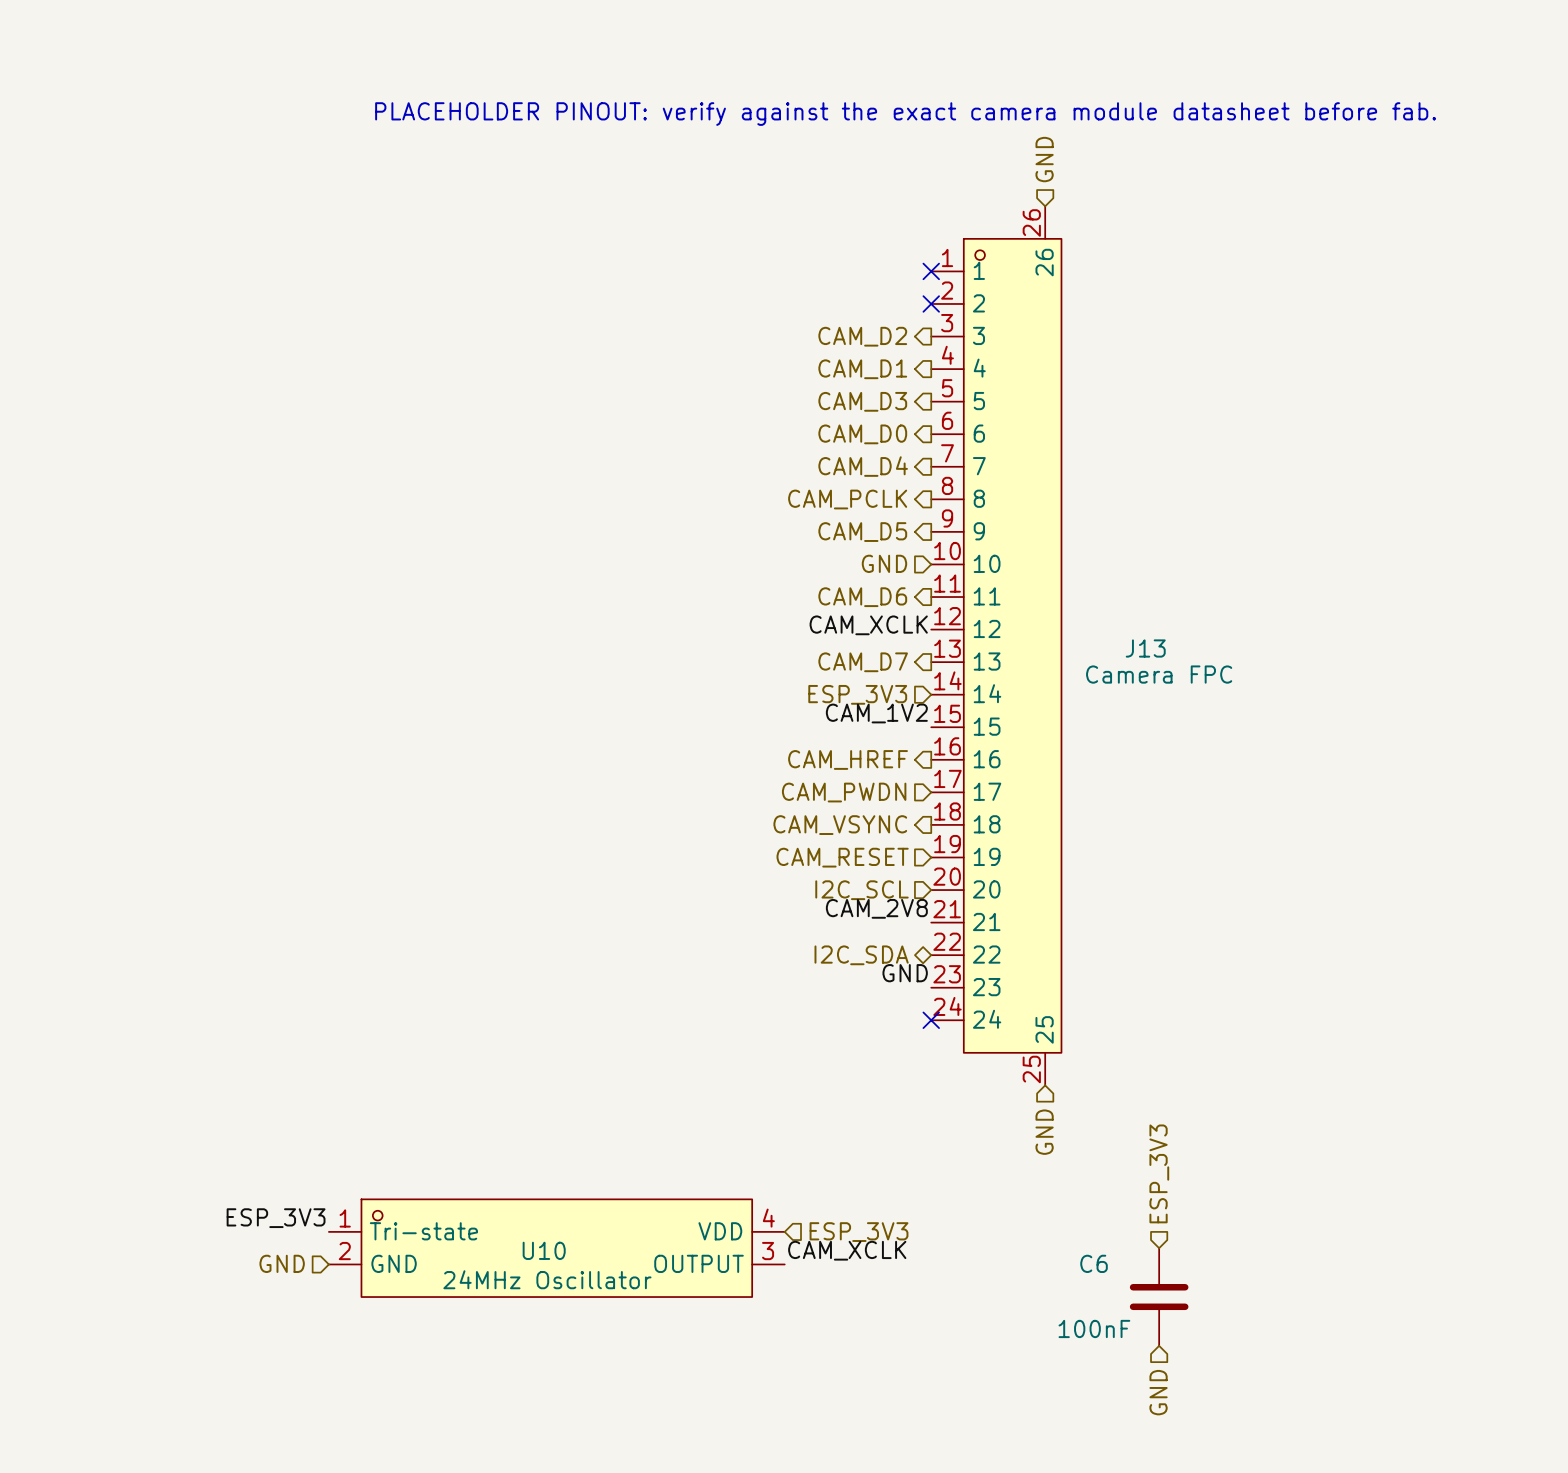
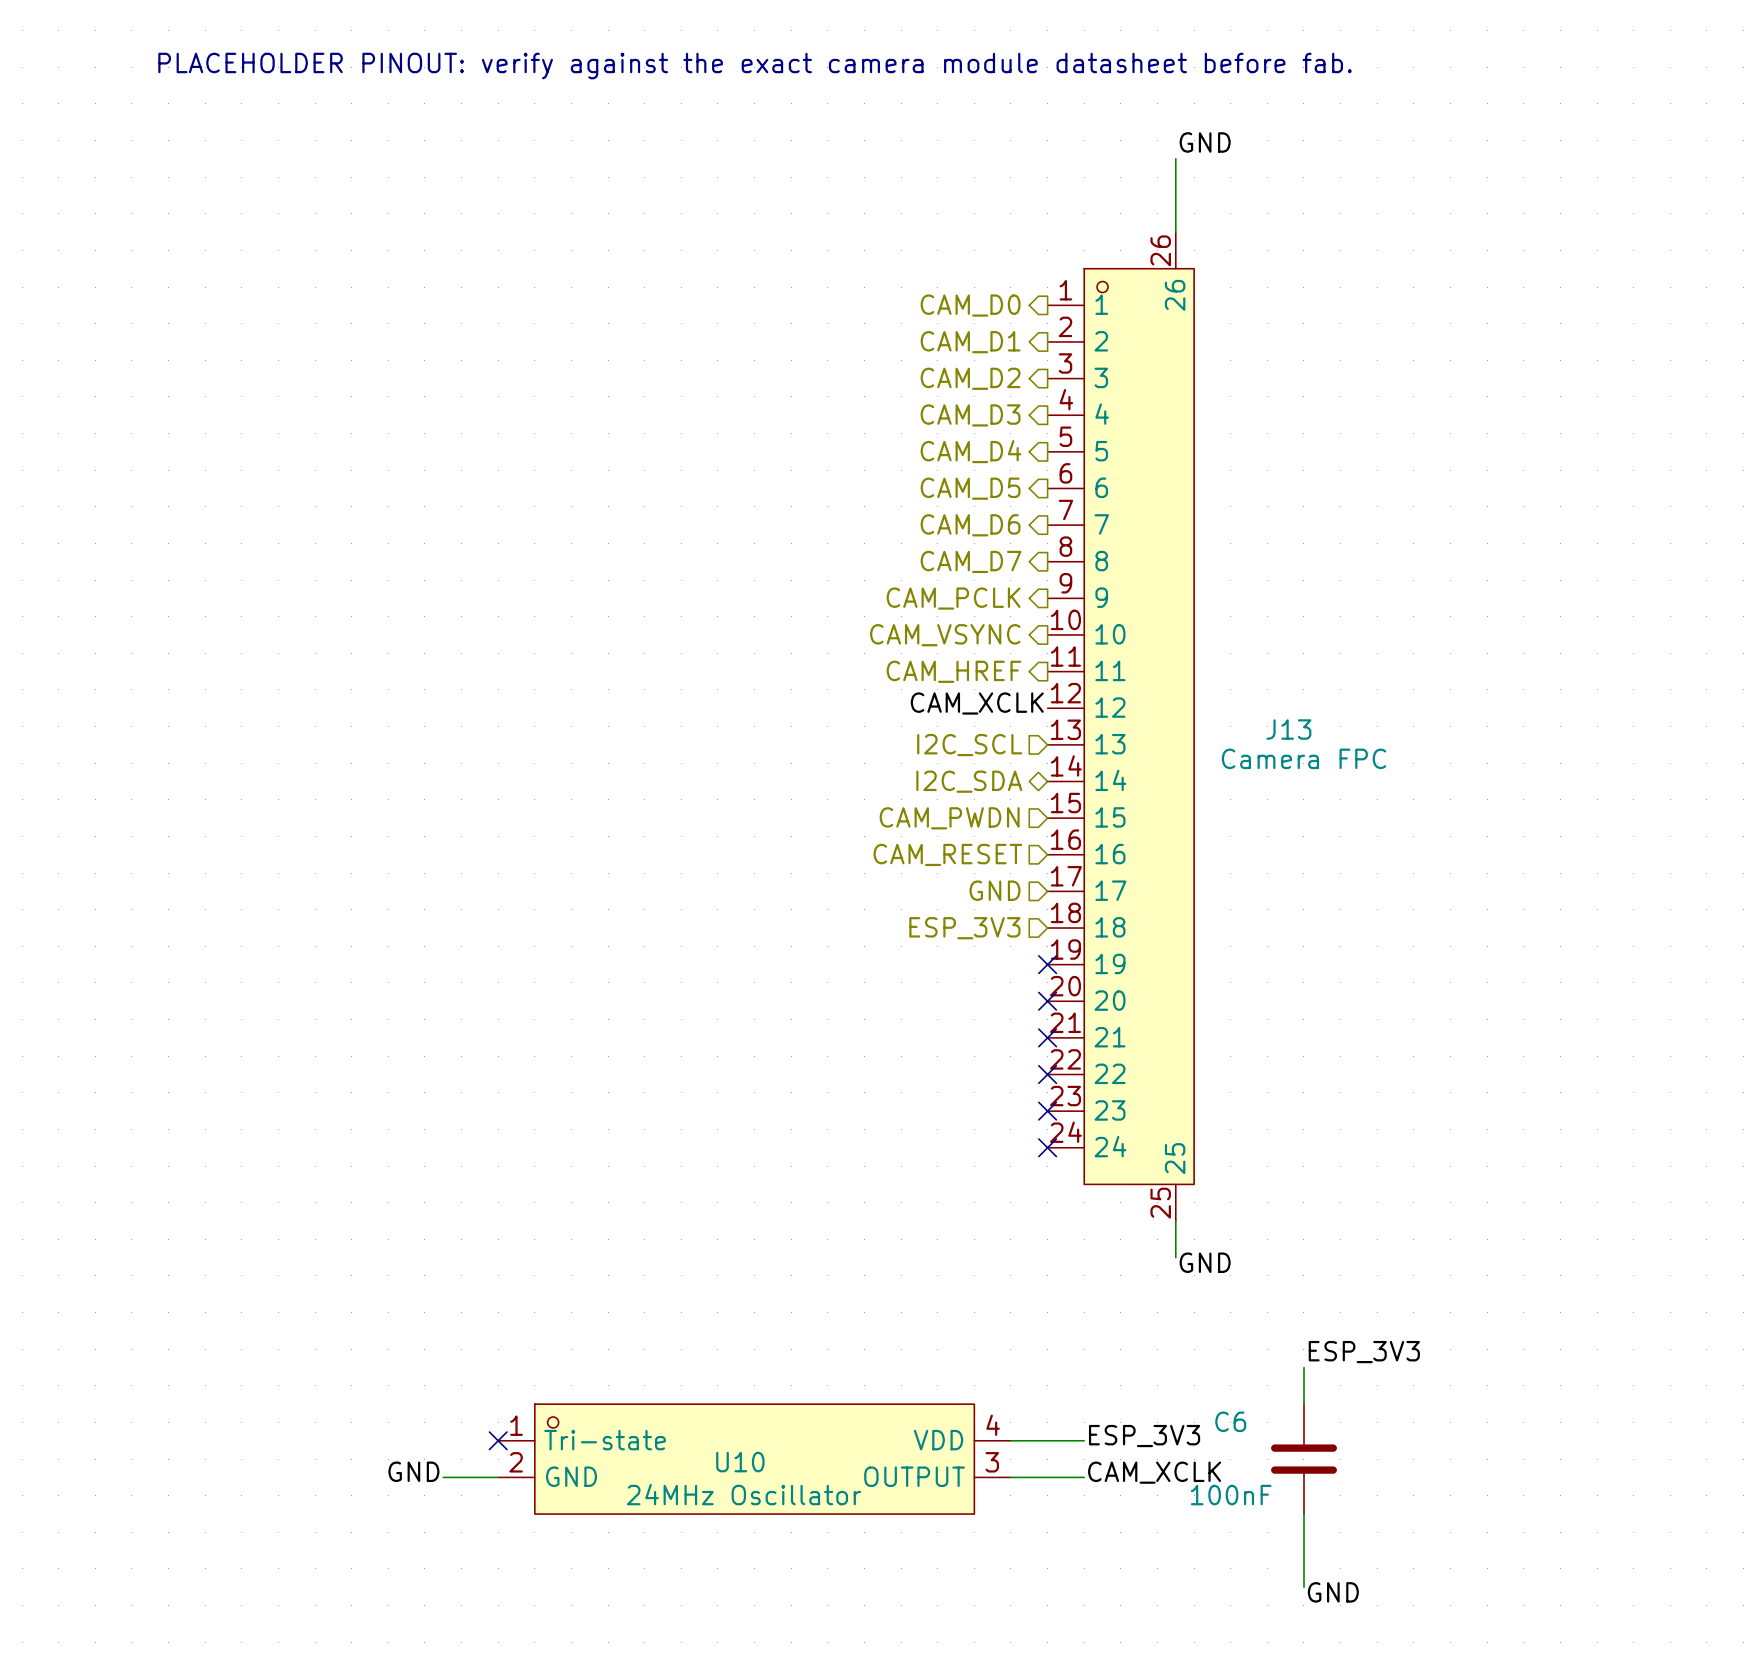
text position: PLACEHOLDER PINOUT: verify against the exact camera module datasheet before fab. (905, 114) -> PLACEHOLDER PINOUT: verify against the exact camera module datasheet before fab. (755, 66)
label: none -> GND (1205, 142)
wire: none -> (1175, 158) (1175, 232)
hierarchical label: GND (1044, 159) -> none
hierarchical label: none -> CAM_D0 (970, 305)
no-connect mark: (931, 271) -> none
no-connect mark: (931, 303) -> none
hierarchical label: none -> CAM_D1 (970, 342)
hierarchical label: CAM_D1 (862, 369) -> CAM_D3 (970, 415)
hierarchical label: CAM_D3 (862, 401) -> CAM_D4 (971, 451)
hierarchical label: CAM_D0 (862, 434) -> CAM_D5 (970, 488)
hierarchical label: CAM_D4 (863, 466) -> CAM_D6 (970, 525)
hierarchical label: CAM_PCLK (847, 499) -> CAM_D7 (971, 561)
hierarchical label: CAM_D5 (862, 532) -> CAM_PCLK (953, 598)
hierarchical label shape: input (884, 563) -> output (945, 635)
hierarchical label: GND (884, 563) -> CAM_VSYNC (945, 635)
hierarchical label: CAM_D6 (862, 597) -> CAM_HREF (954, 671)
hierarchical label shape: output (863, 662) -> input (969, 745)
hierarchical label: CAM_D7 (863, 662) -> I2C_SCL (969, 745)
hierarchical label shape: input (857, 694) -> bidirectional (969, 781)
hierarchical label: ESP_3V3 (857, 694) -> I2C_SDA (969, 781)
label: CAM_1V2 (876, 713) -> none
hierarchical label: none -> CAM_PWDN (949, 818)
hierarchical label shape: output (848, 759) -> input (947, 854)
hierarchical label: CAM_HREF (848, 759) -> CAM_RESET (947, 854)
hierarchical label: CAM_PWDN (844, 792) -> GND (994, 890)
hierarchical label shape: output (840, 825) -> input (964, 928)
hierarchical label: CAM_VSYNC (840, 825) -> ESP_3V3 (964, 928)
hierarchical label: CAM_RESET (842, 857) -> none
no-connect mark: none -> (1047, 964)
hierarchical label: I2C_SCL (861, 890) -> none
no-connect mark: none -> (1047, 1001)
label: CAM_2V8 (876, 908) -> none
no-connect mark: none -> (1047, 1037)
hierarchical label: I2C_SDA (861, 955) -> none
no-connect mark: none -> (1047, 1074)
label position: GND (905, 973) -> GND (1205, 1262)
no-connect mark: none -> (1047, 1111)
wire: none -> (1175, 1221) (1175, 1257)
hierarchical label: GND (1044, 1132) -> none
hierarchical label: ESP_3V3 (1159, 1173) -> none
label: none -> ESP_3V3 (1364, 1352)
wire: none -> (1303, 1367) (1303, 1404)
label: ESP_3V3 (276, 1218) -> none
hierarchical label: ESP_3V3 (859, 1232) -> none
U10 position: (556, 1248) -> (754, 1459)
label position: CAM_XCLK (847, 1250) -> CAM_XCLK (1154, 1472)
hierarchical label: GND (282, 1263) -> none
label: none -> ESP_3V3 (1144, 1436)
no-connect mark: none -> (498, 1440)
wire: none -> (1010, 1440) (1084, 1440)
label: none -> GND (413, 1471)
wire: none -> (443, 1477) (498, 1477)
wire: none -> (1010, 1477) (1084, 1477)
wire: none -> (1303, 1514) (1303, 1587)
hierarchical label: GND (1158, 1392) -> none
label: none -> GND (1333, 1592)

